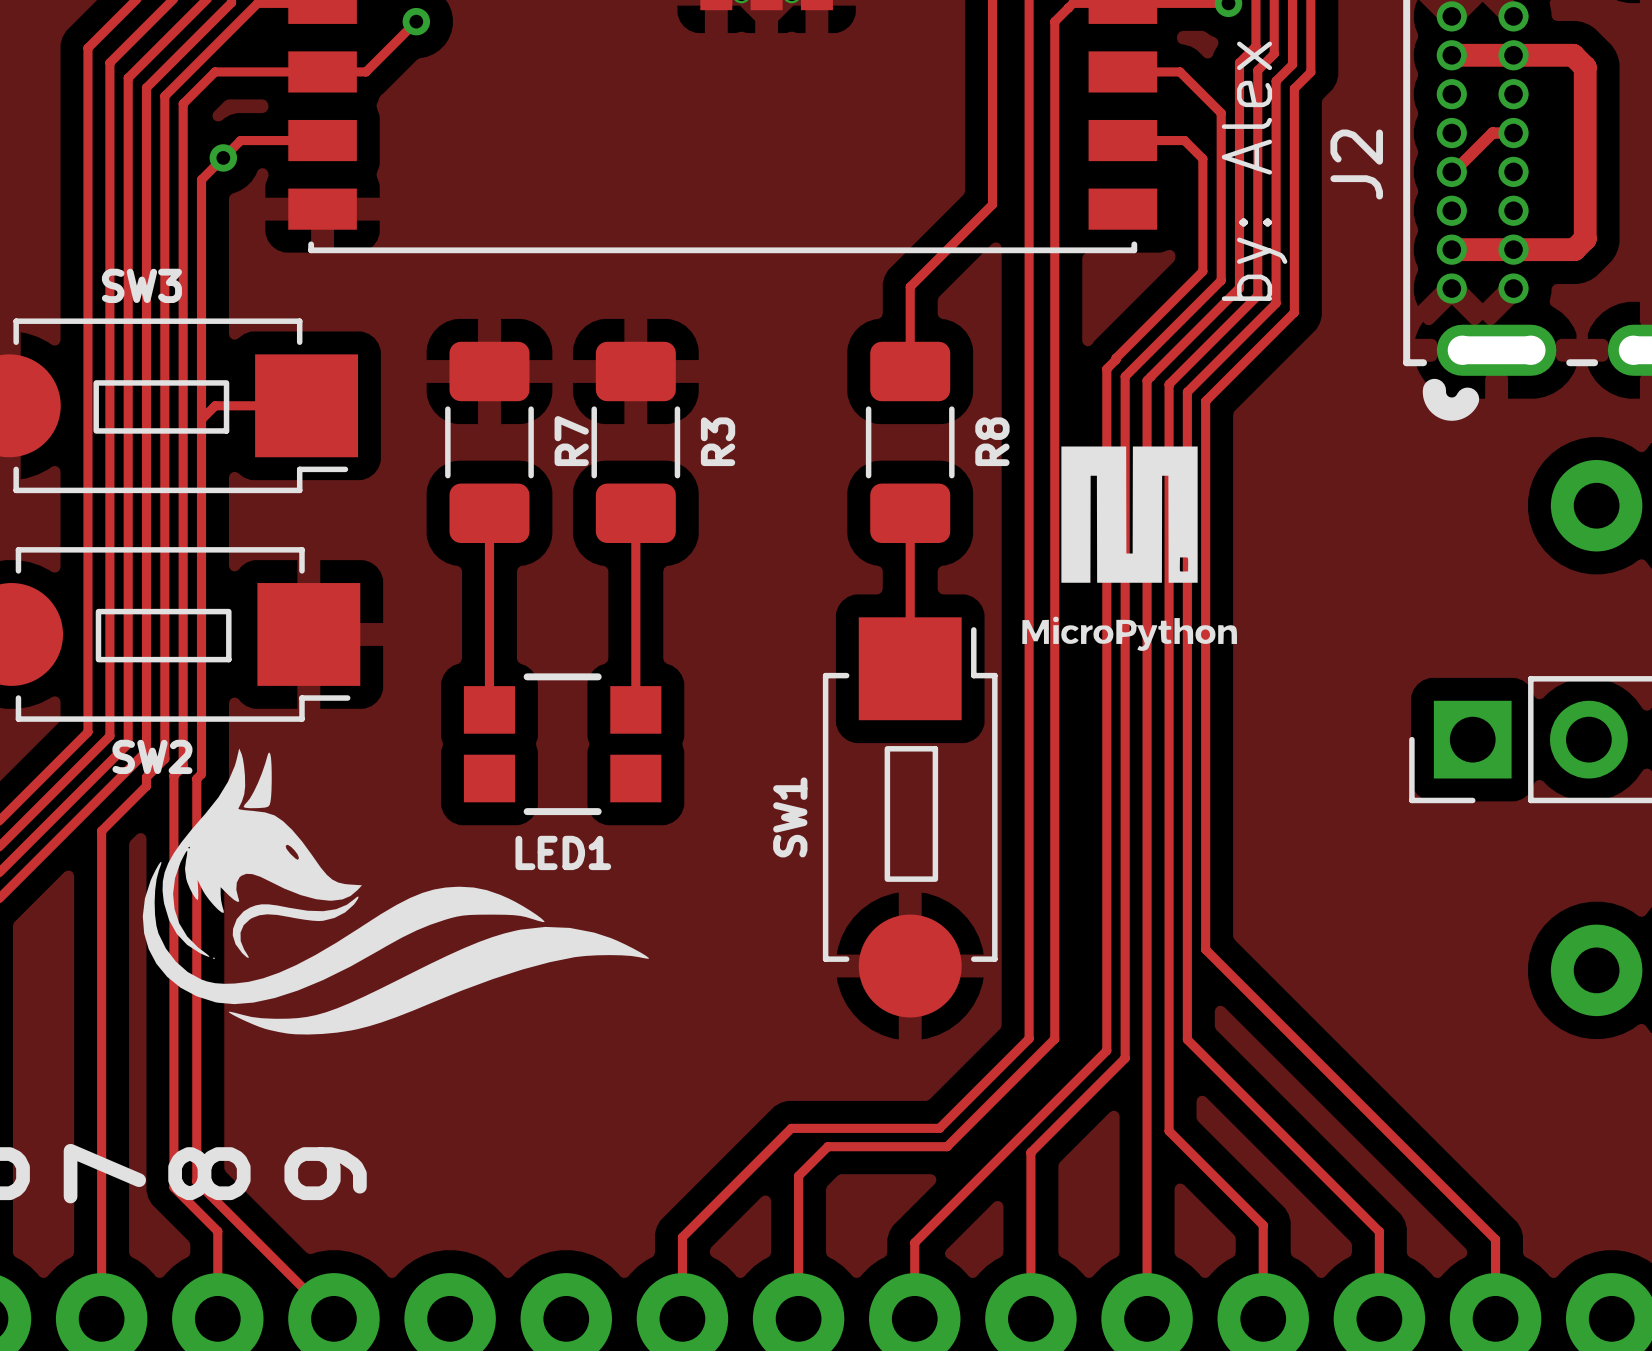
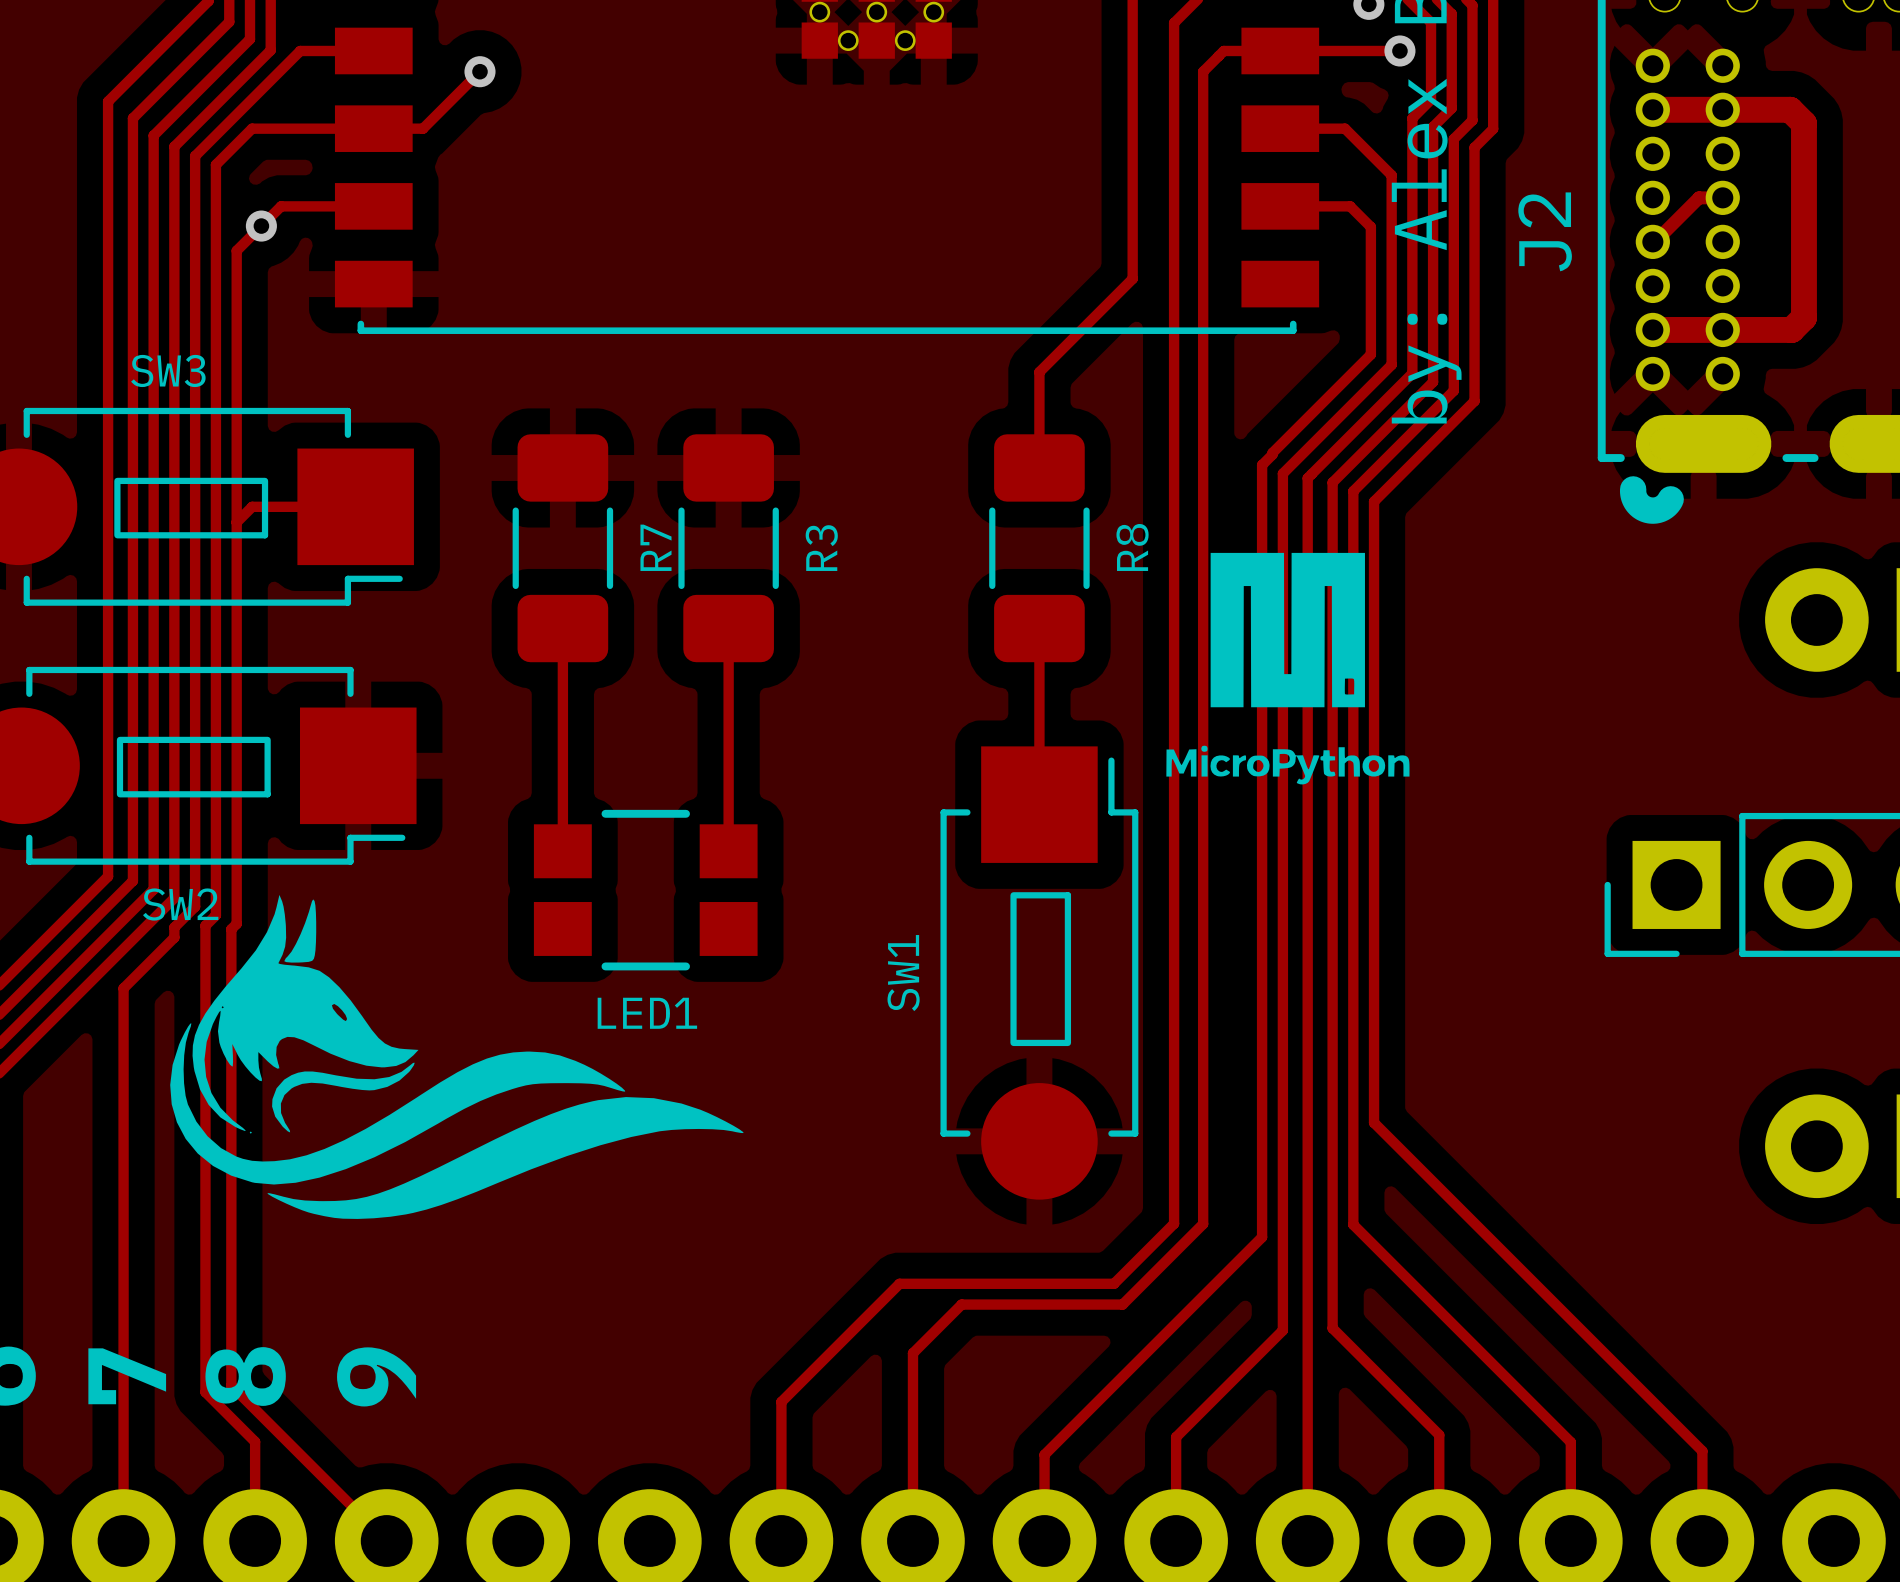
track: (1125, 1058) (1030, 1152) (1030, 1227) -> (1282, 1245) (1282, 1330) (1176, 1437)
track: (976, 1091) (939, 1128) (791, 1128) (682, 1237) -> (1114, 1283) (899, 1283) (781, 1401) (781, 1448)
track: (983, 1110) (947, 1146) (827, 1146) (798, 1175) -> (1122, 1304) (961, 1304) (912, 1353) (912, 1379)

